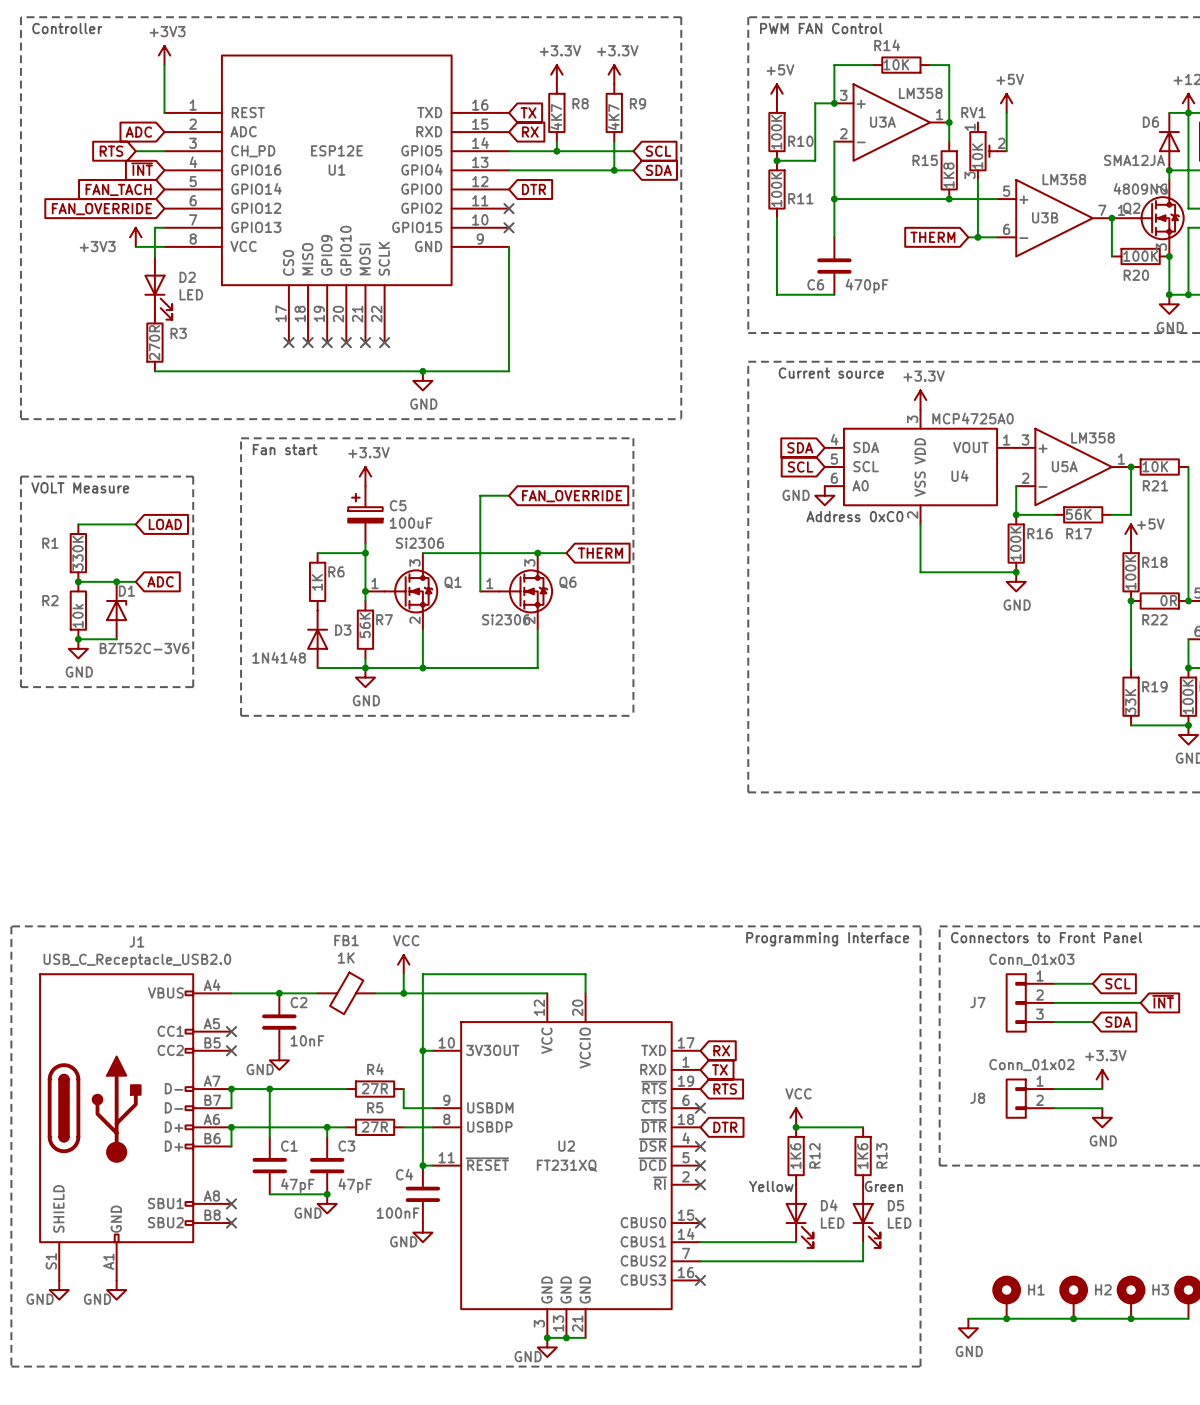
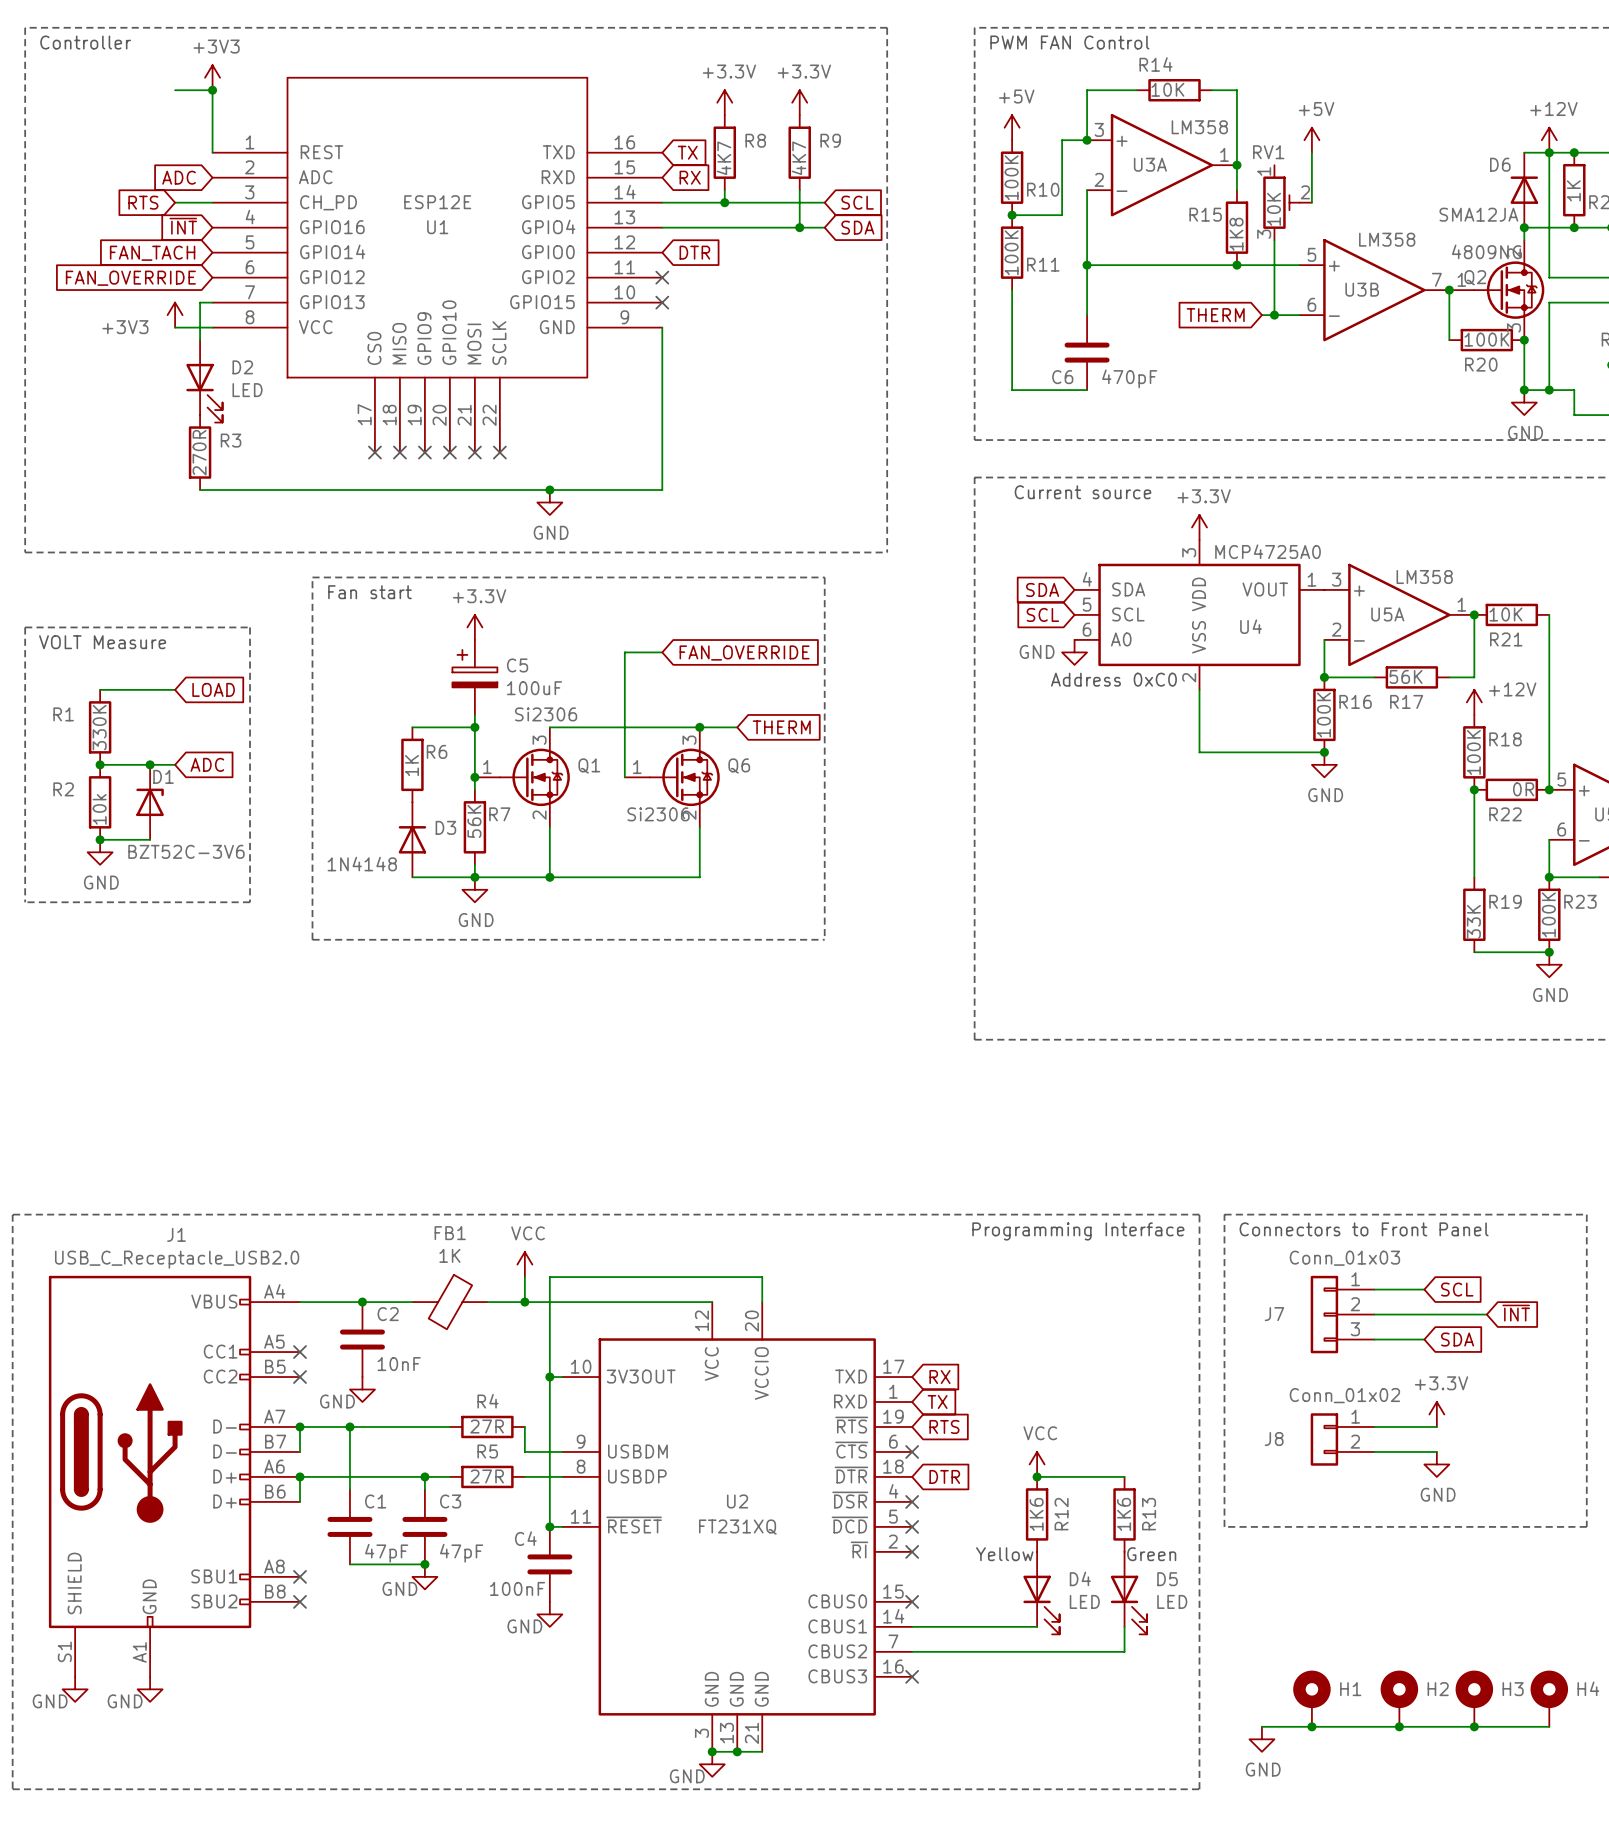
wire: none -> (175, 90) (212, 90)
junction: none -> (212, 90)
power symbol: +5V (1131, 534) -> +12V (1474, 702)

